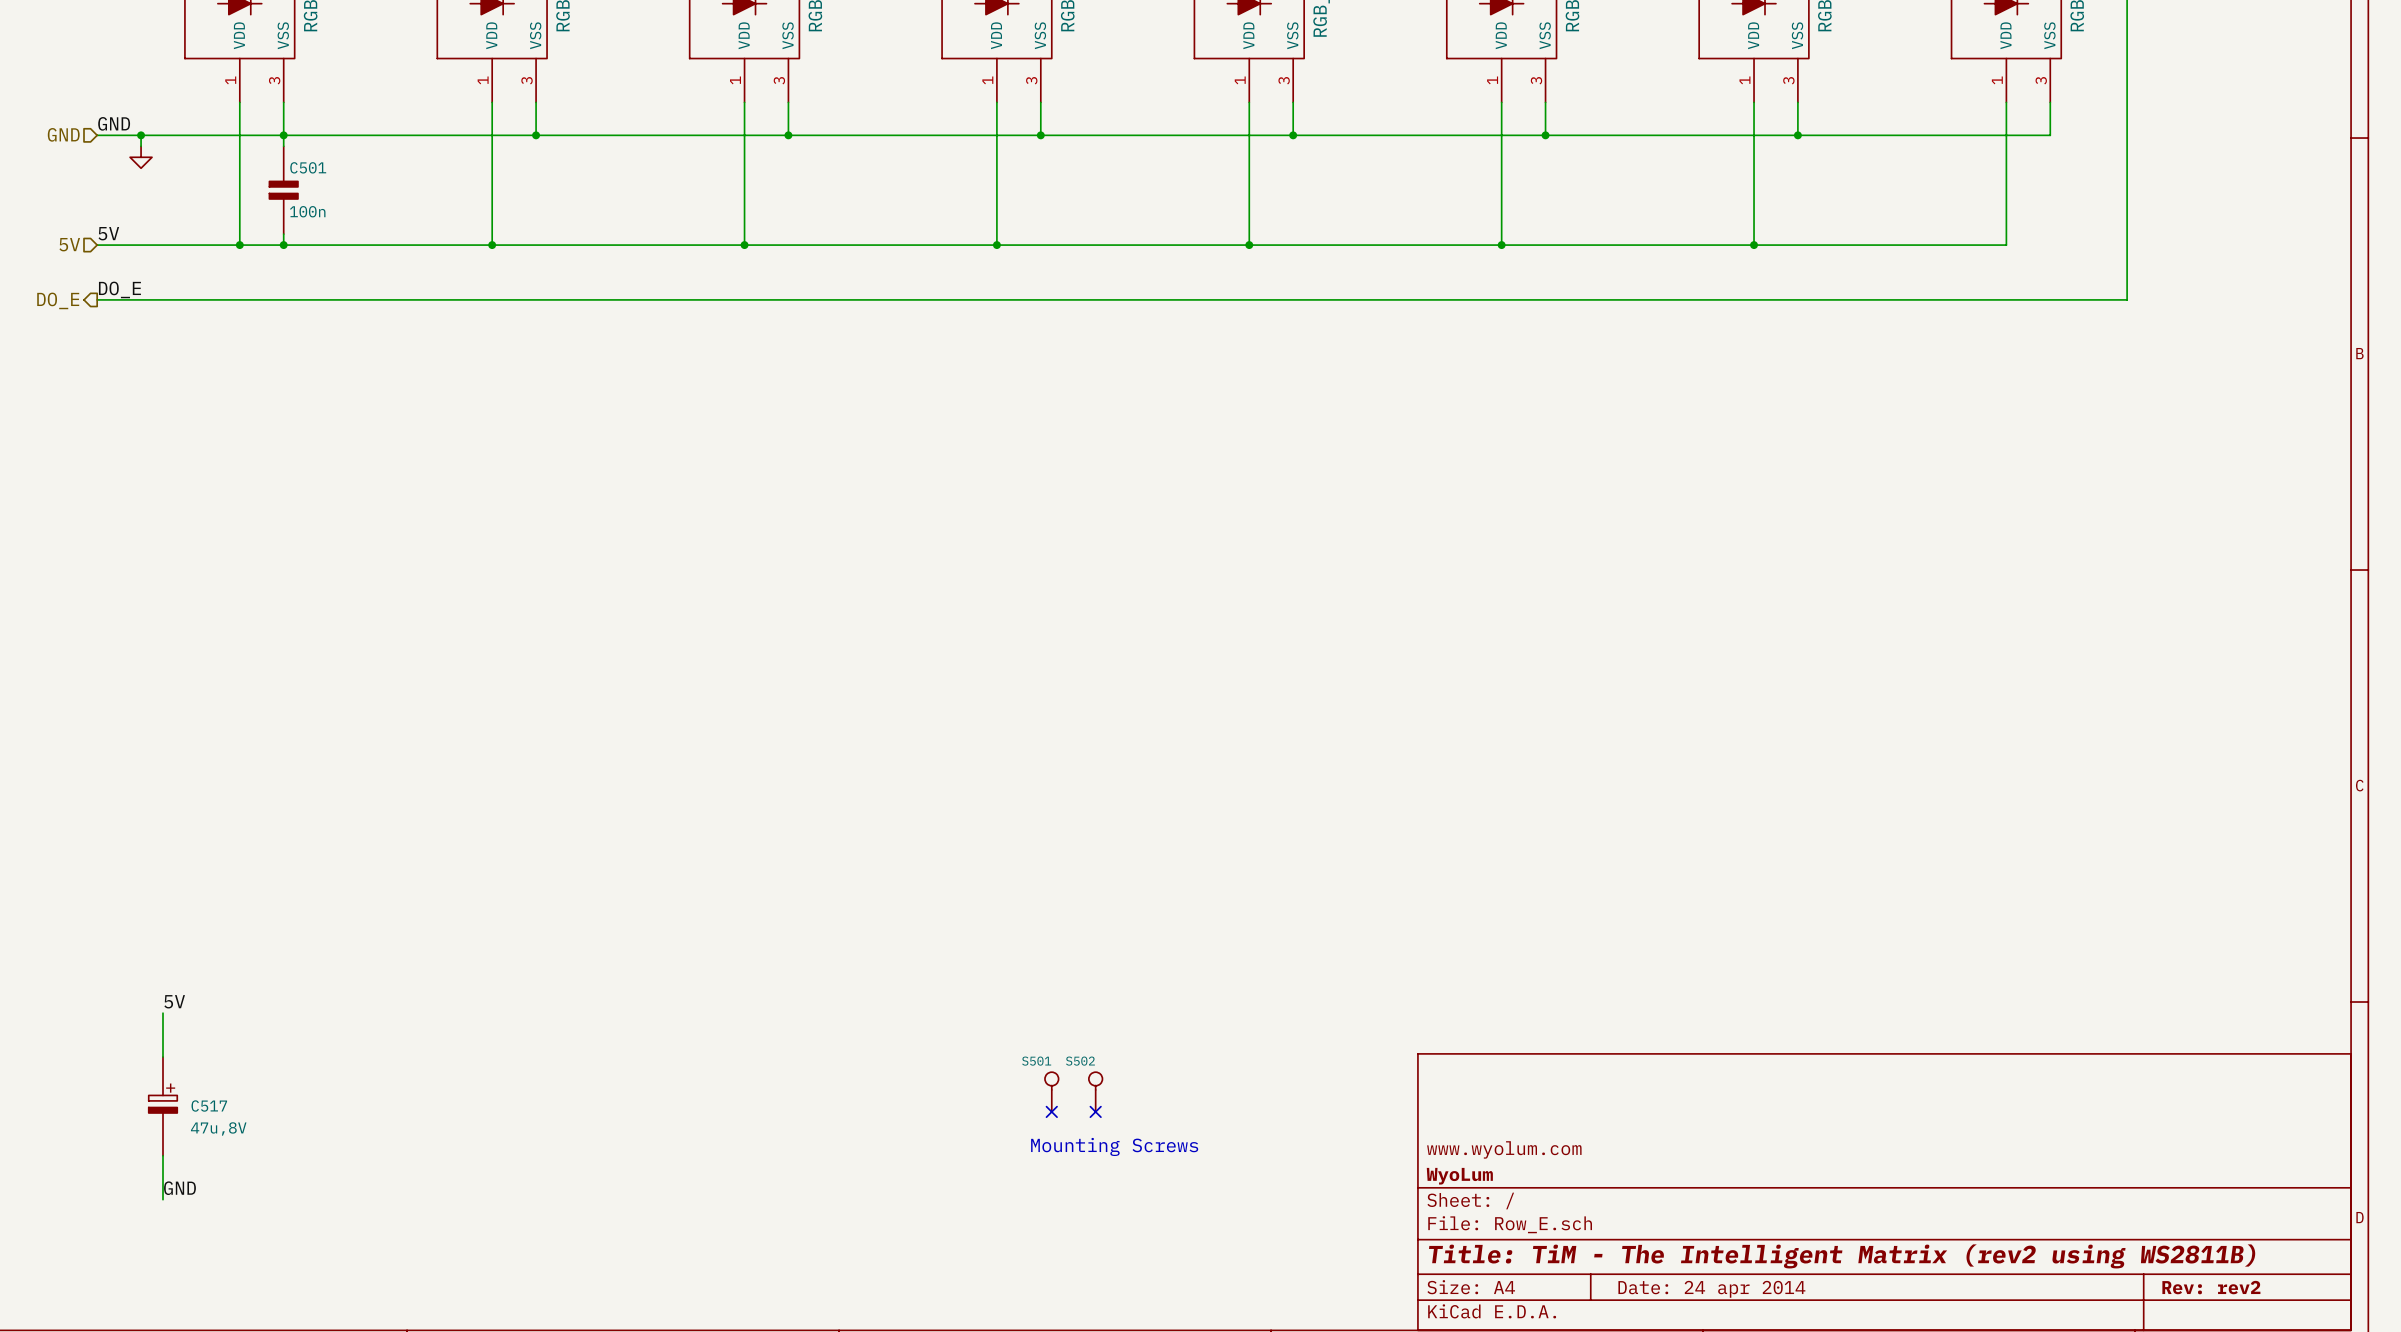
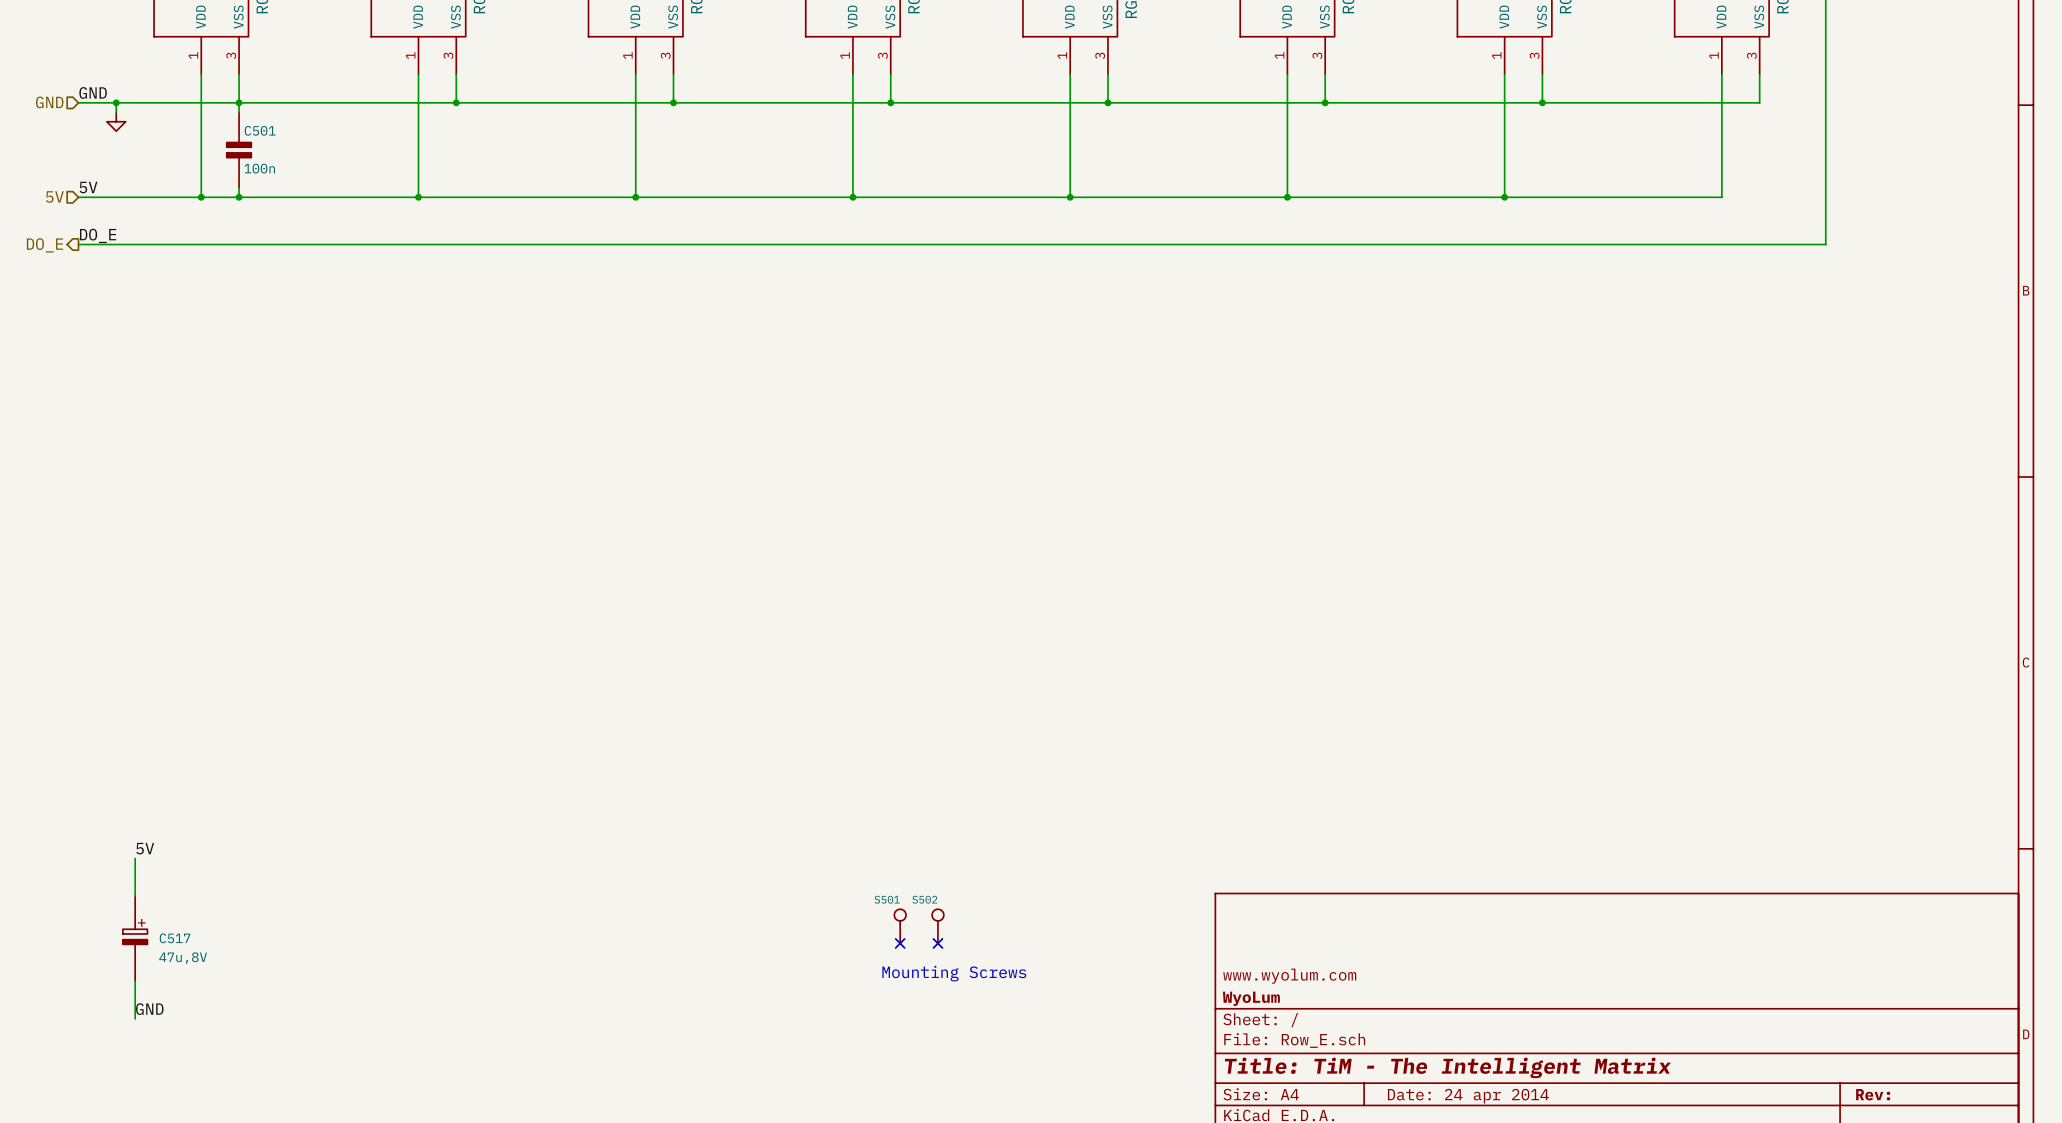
title block: Title: TiM - The Intelligent Matrix (rev2 using WS2811B) (1842, 1256) -> Title: TiM - The Intelligent Matrix (1447, 1067)
title block: Rev: rev2 (2211, 1287) -> Rev: (1873, 1094)

